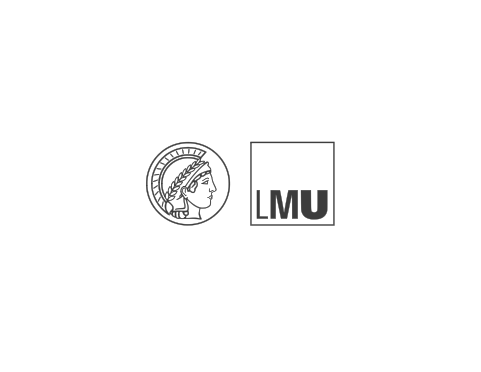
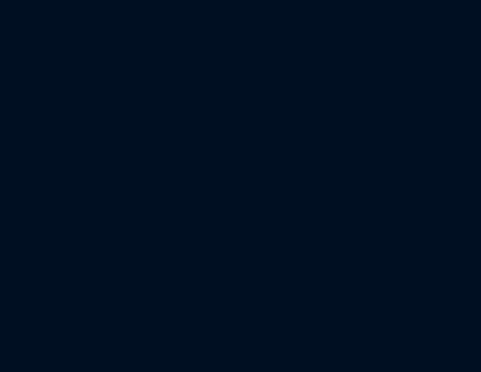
drawing: [145, 141, 335, 226] -> none

